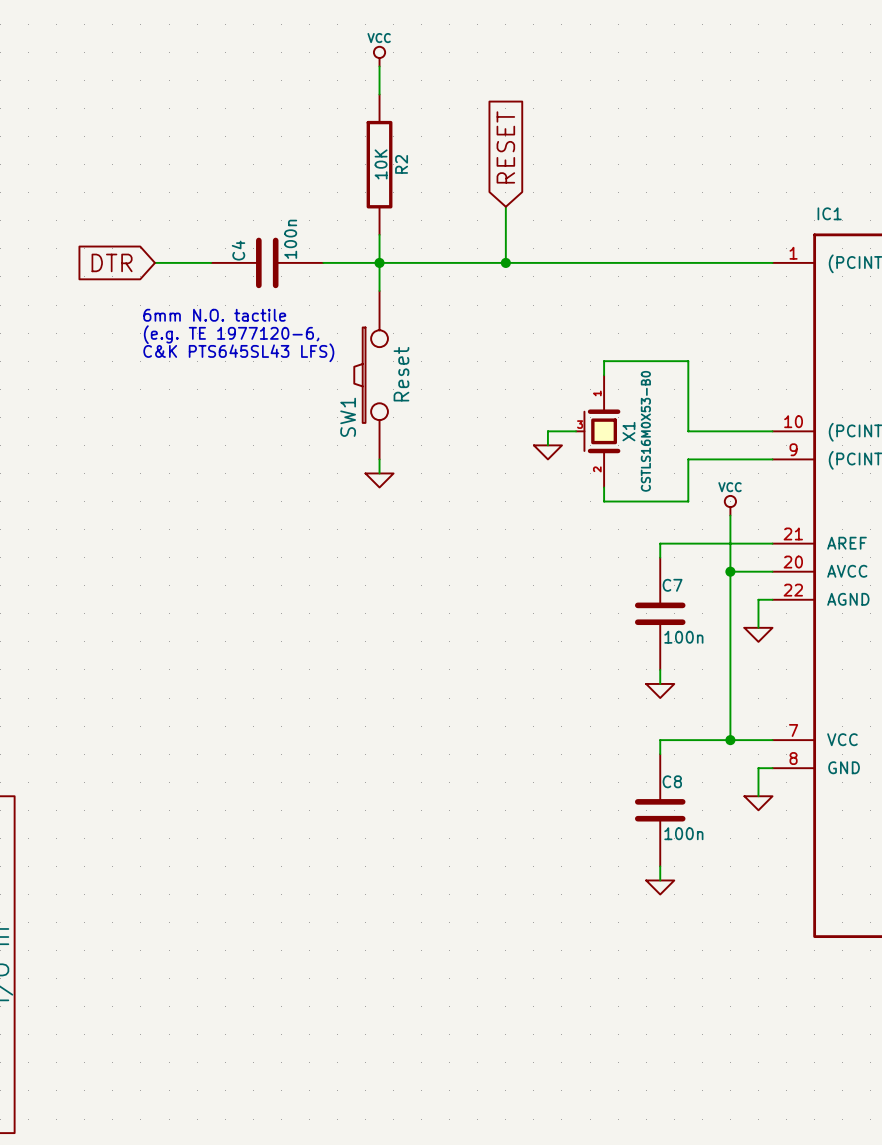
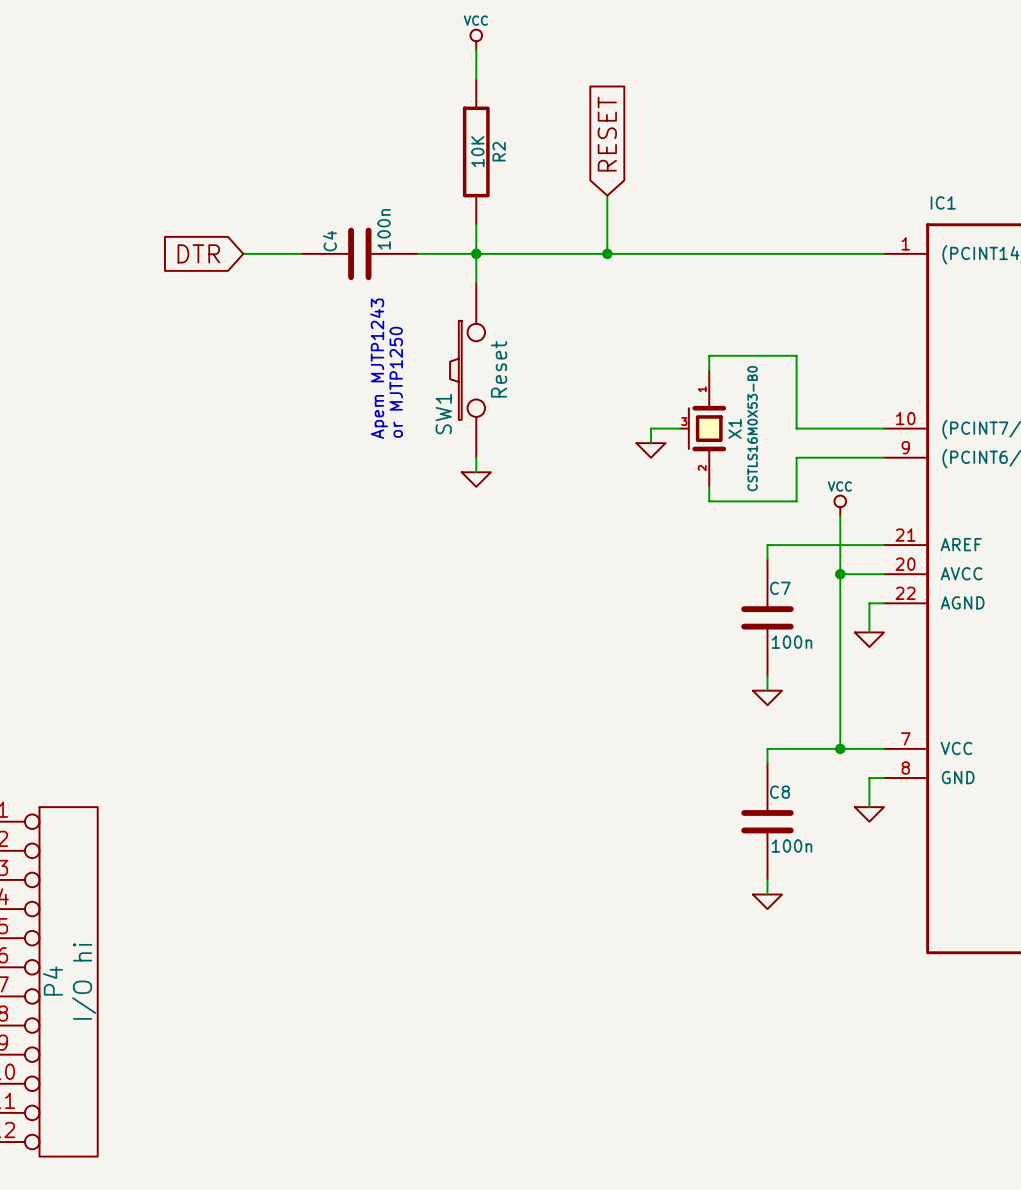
text: 6mm N.O. tactile (214, 315) -> none
text: (e.g. TE 1977120-6, (231, 334) -> none
text: C&K PTS645SL43 LFS) (238, 352) -> none
text: none -> Apem MJTP1243 (379, 368)
text: none -> or MJTP1250 (396, 382)

